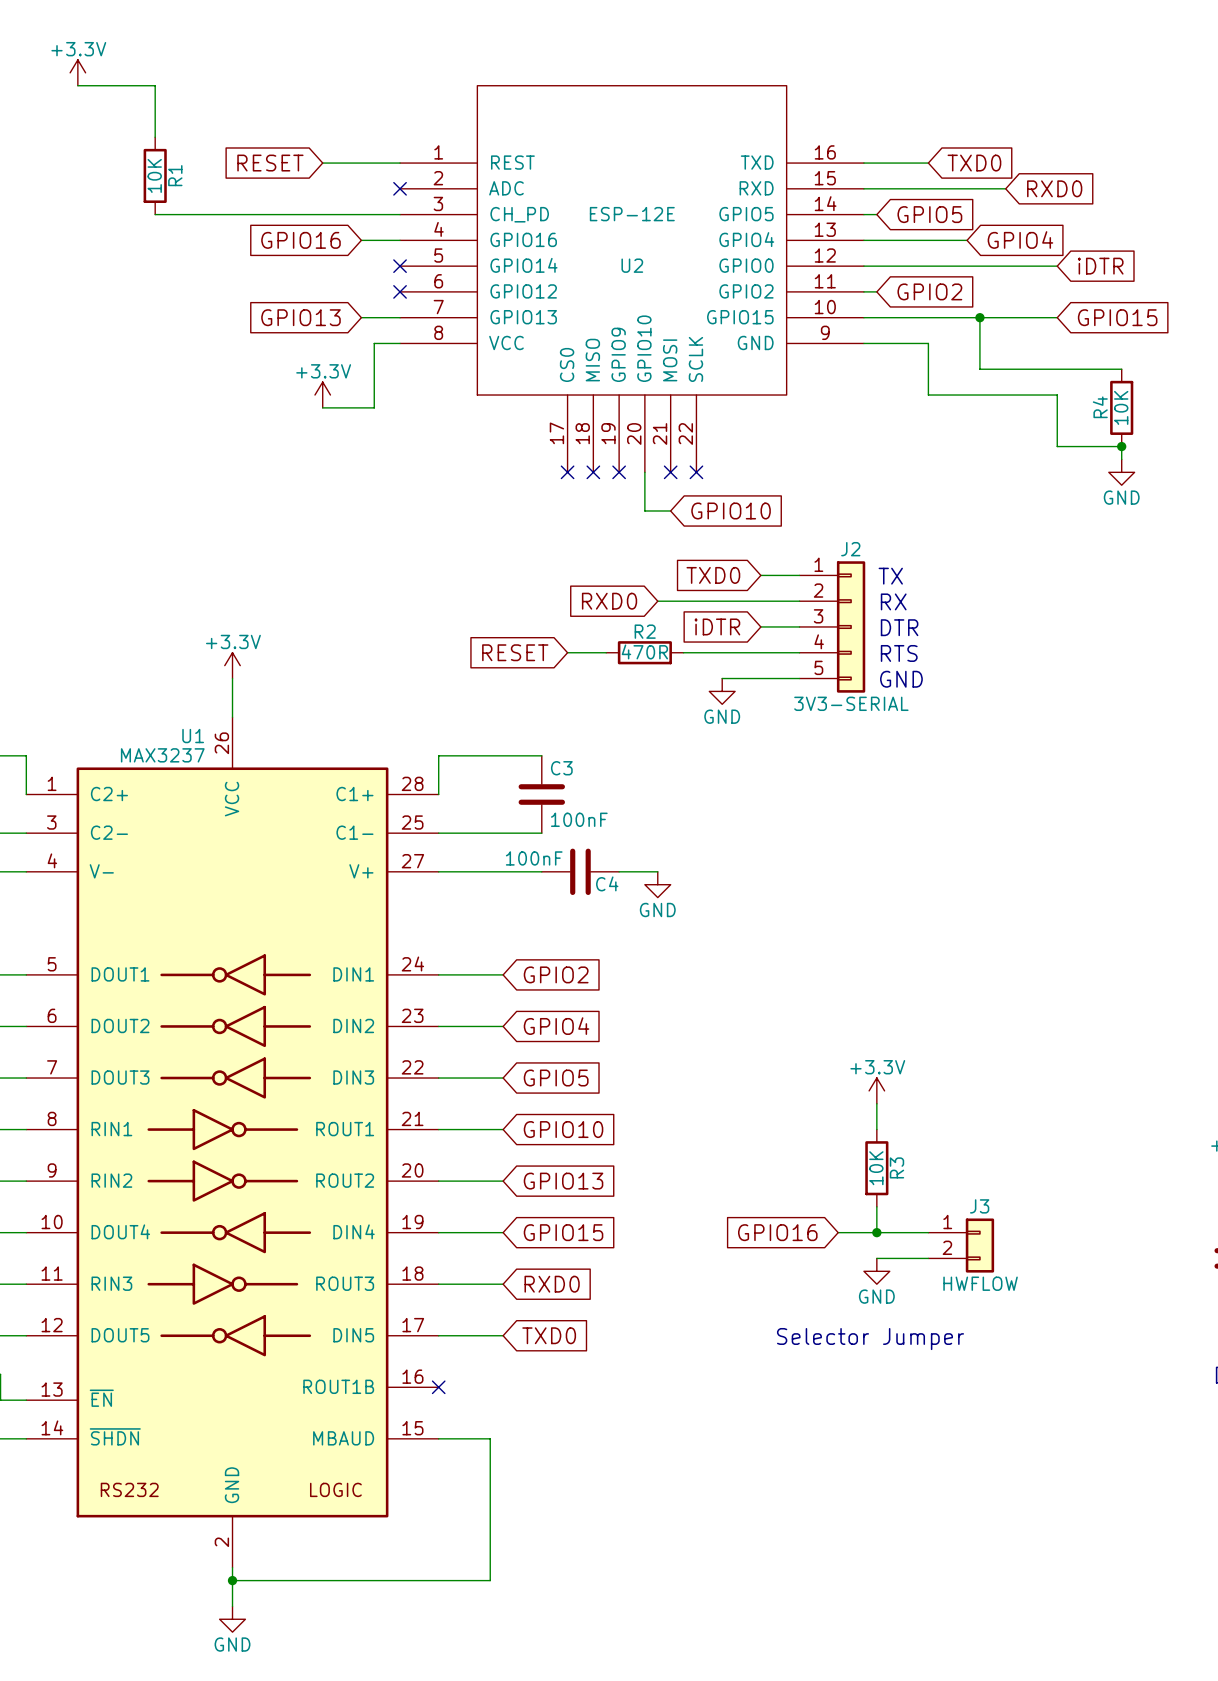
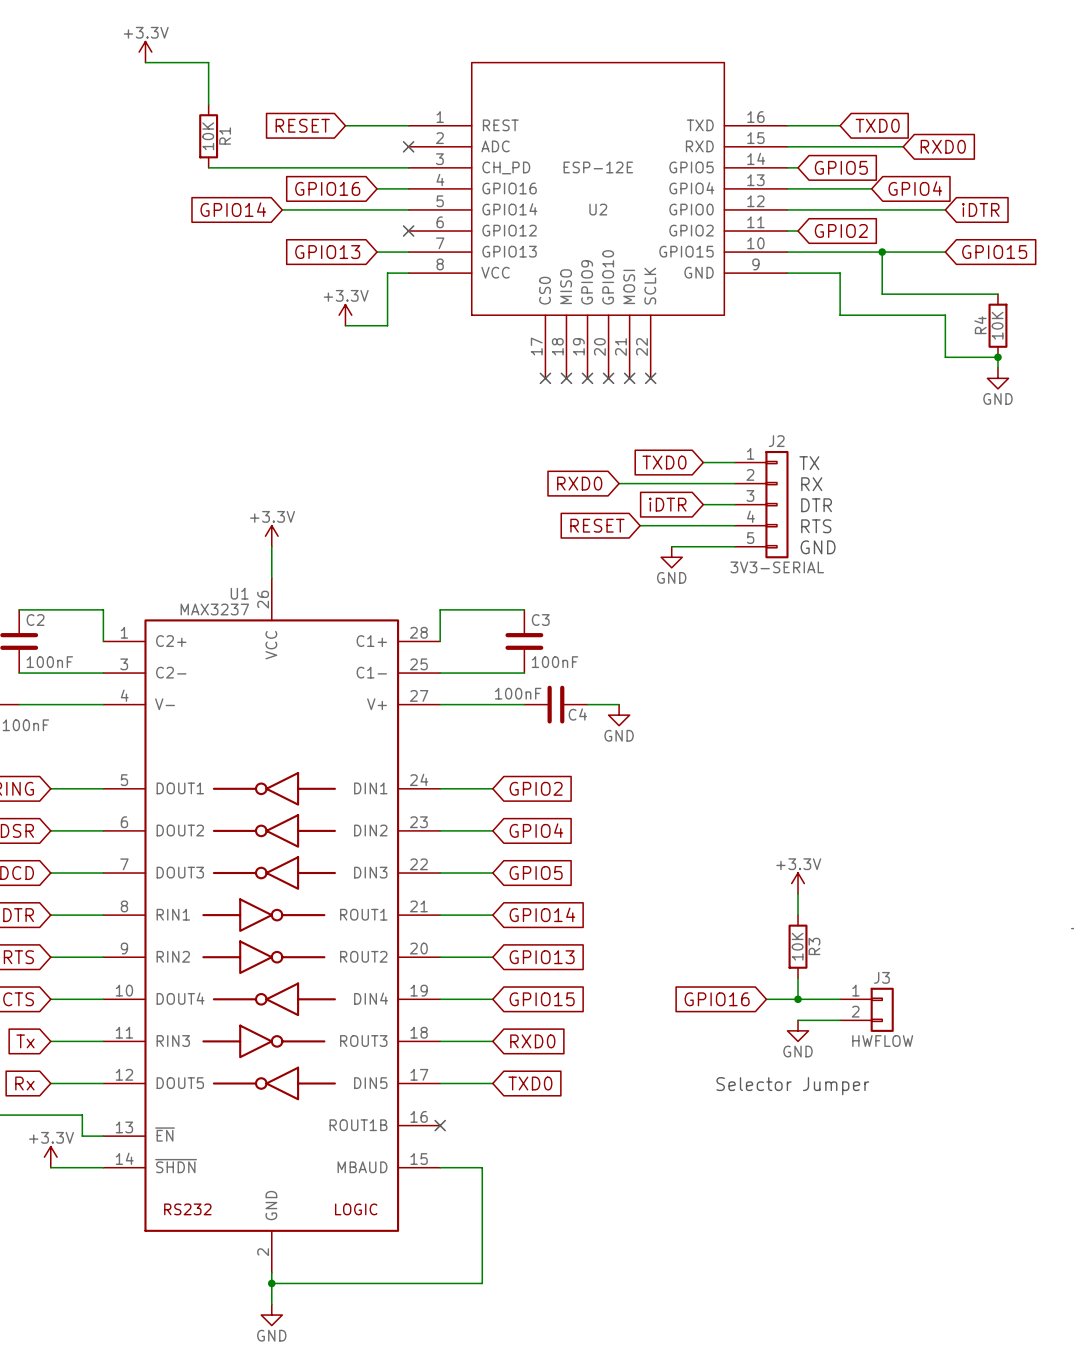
global label: none -> GPIO14 (233, 209)
wire: none -> (282, 209) (408, 209)
no-connect mark: (400, 266) -> none
wire: (644, 472) (644, 510) (670, 510) -> none
no-connect mark: none -> (608, 378)
global label: GPIO10 (731, 510) -> none
global label position: RESET (515, 652) -> RESET (597, 525)
wire: (567, 652) (606, 652) -> none
R2: 470R (644, 652) -> none
global label: GPIO10 (563, 1129) -> GPIO14 (542, 914)

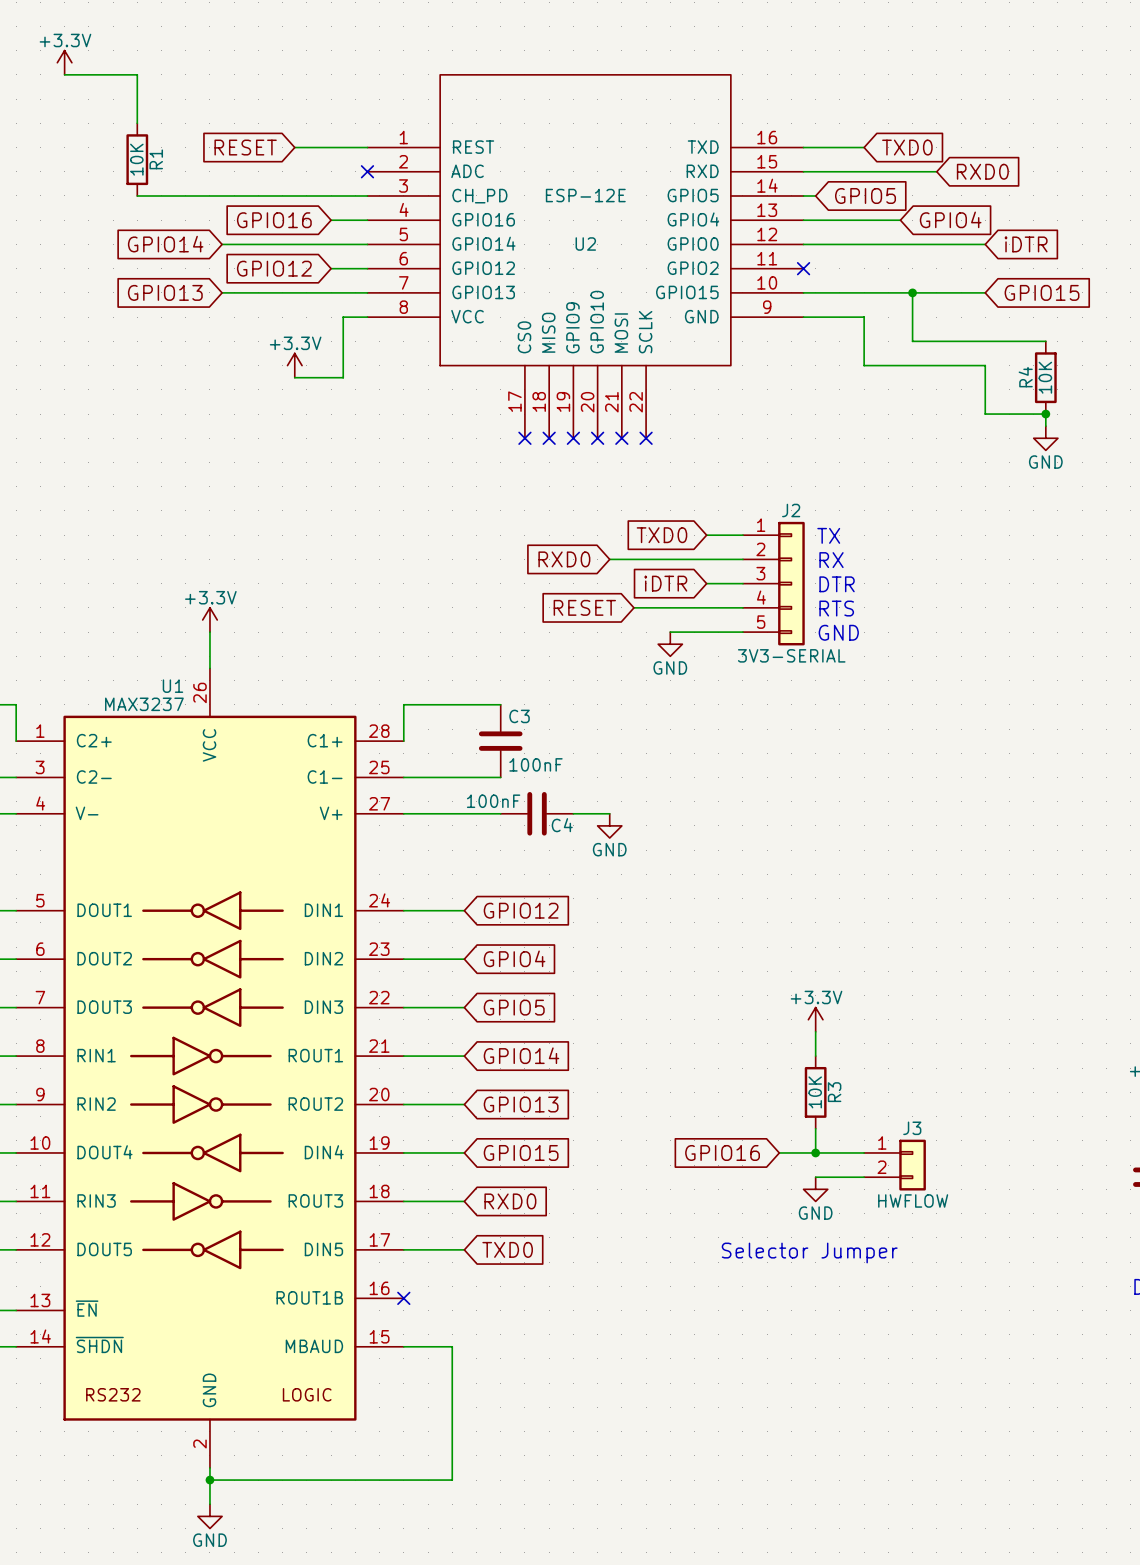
global label: none -> GPIO12 (274, 268)
wire: none -> (331, 268) (367, 268)
no-connect mark: (408, 231) -> none
wire: (787, 231) (798, 231) -> none
no-connect mark: none -> (803, 268)
global label: GPIO2 (841, 231) -> none
wire: none -> (222, 292) (331, 292)
global label position: GPIO13 (327, 252) -> GPIO13 (165, 292)
global label: GPIO2 (536, 788) -> GPIO12 (521, 910)

